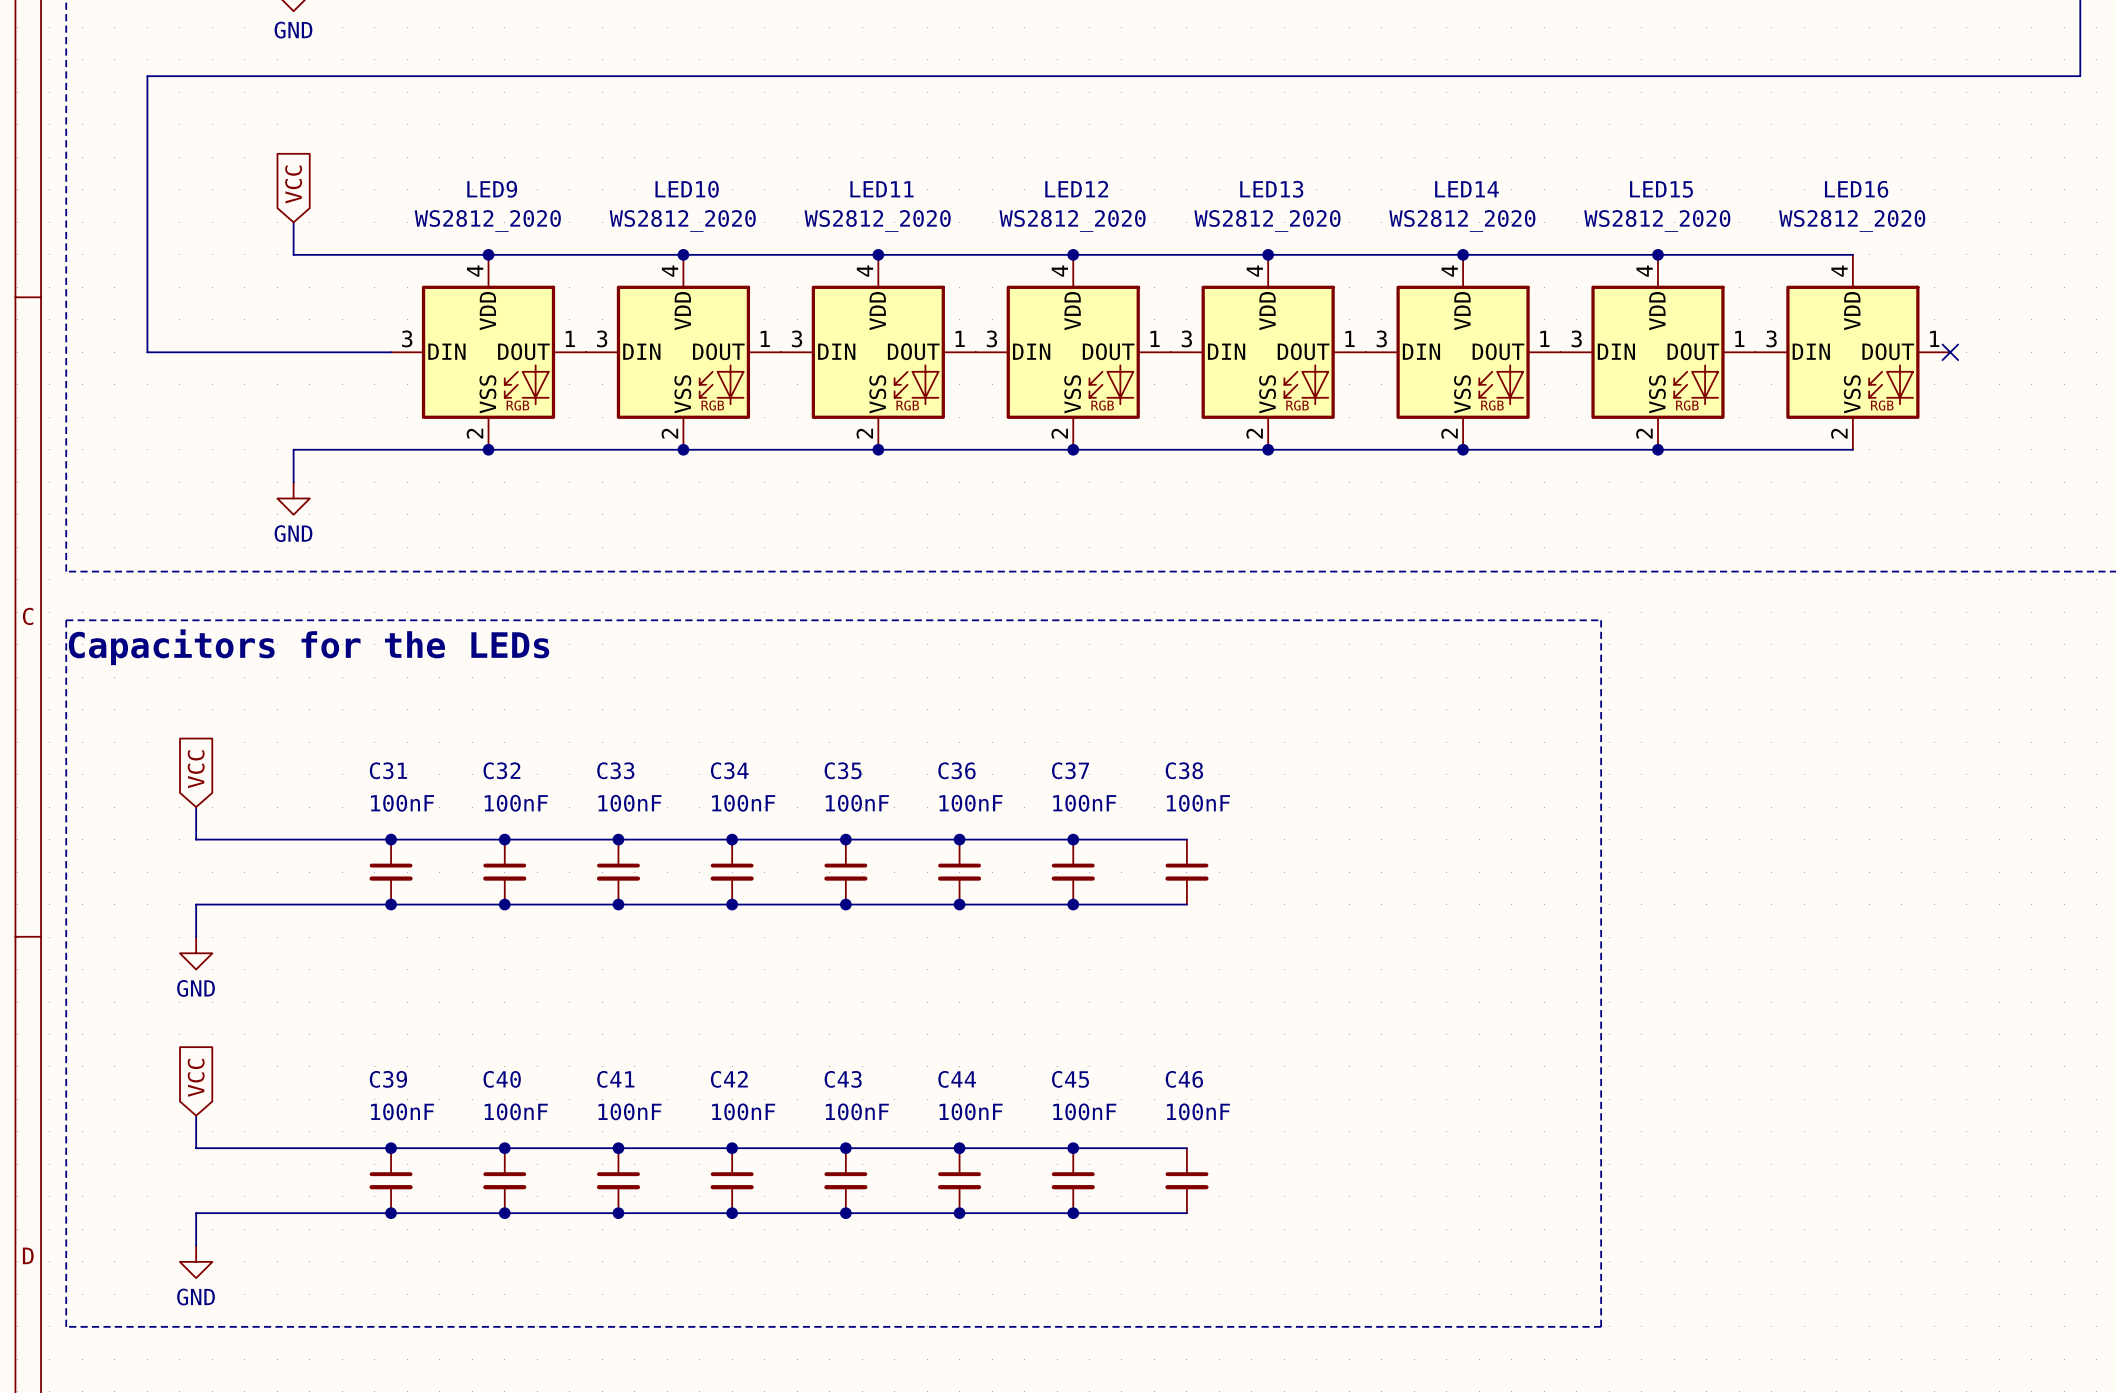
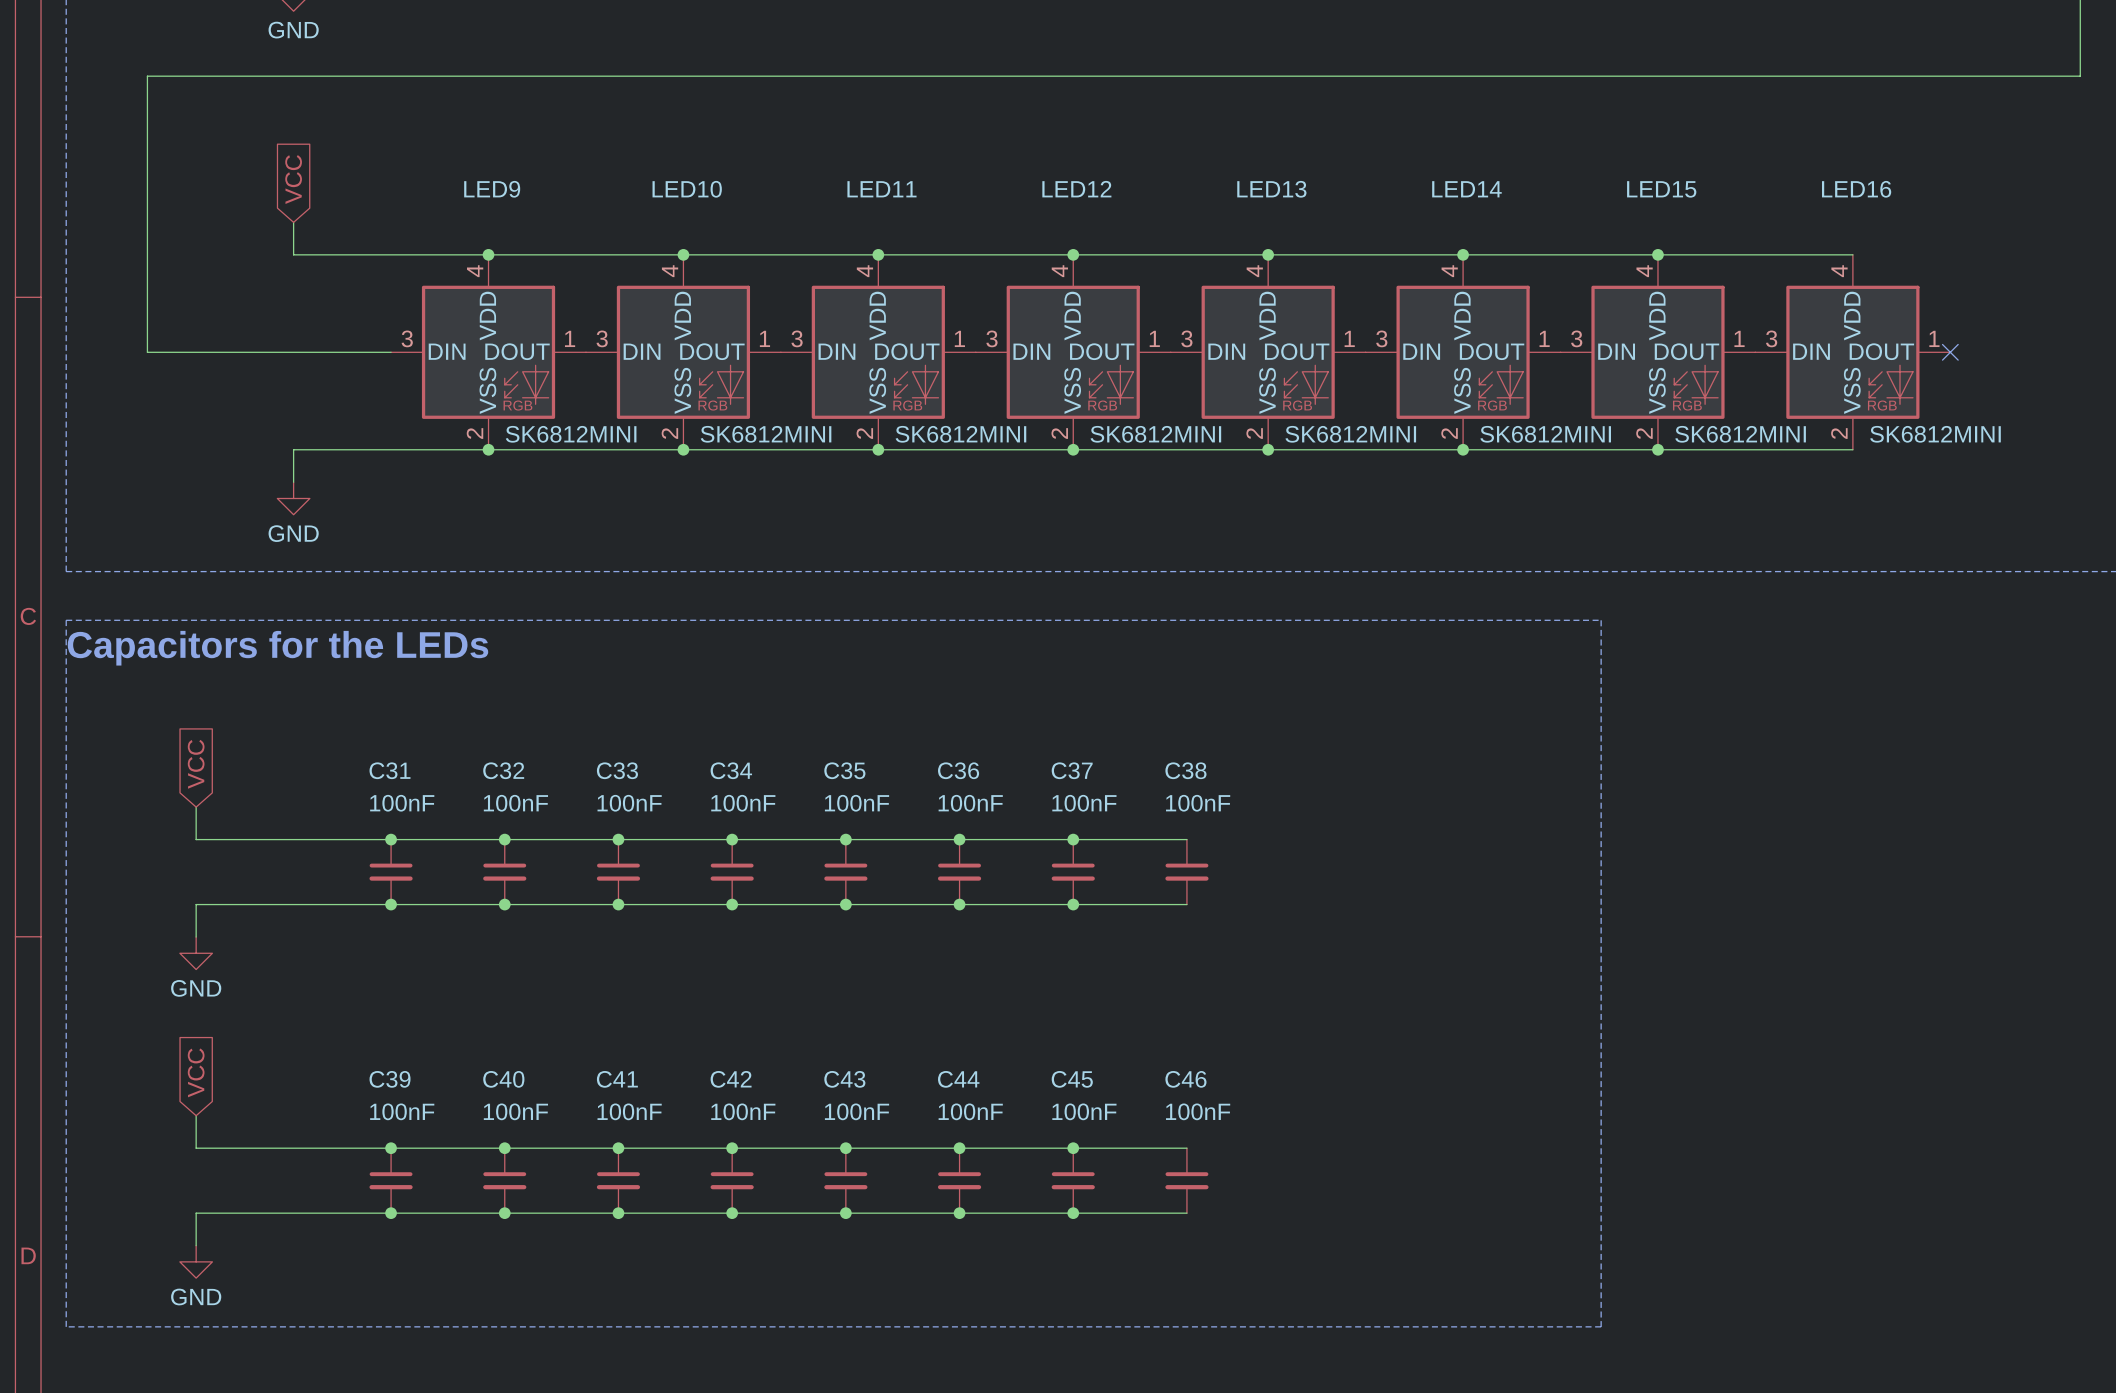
LED9 value: WS2812_2020 (487, 220) -> SK6812MINI (571, 434)
LED10 value: WS2812_2020 (682, 220) -> SK6812MINI (766, 434)
LED11 value: WS2812_2020 (877, 220) -> SK6812MINI (960, 434)
LED12 value: WS2812_2020 (1072, 220) -> SK6812MINI (1155, 434)
LED13 value: WS2812_2020 (1267, 220) -> SK6812MINI (1350, 434)
LED14 value: WS2812_2020 (1462, 220) -> SK6812MINI (1545, 434)
LED15 value: WS2812_2020 (1657, 220) -> SK6812MINI (1740, 434)
LED16 value: WS2812_2020 (1852, 220) -> SK6812MINI (1935, 434)

